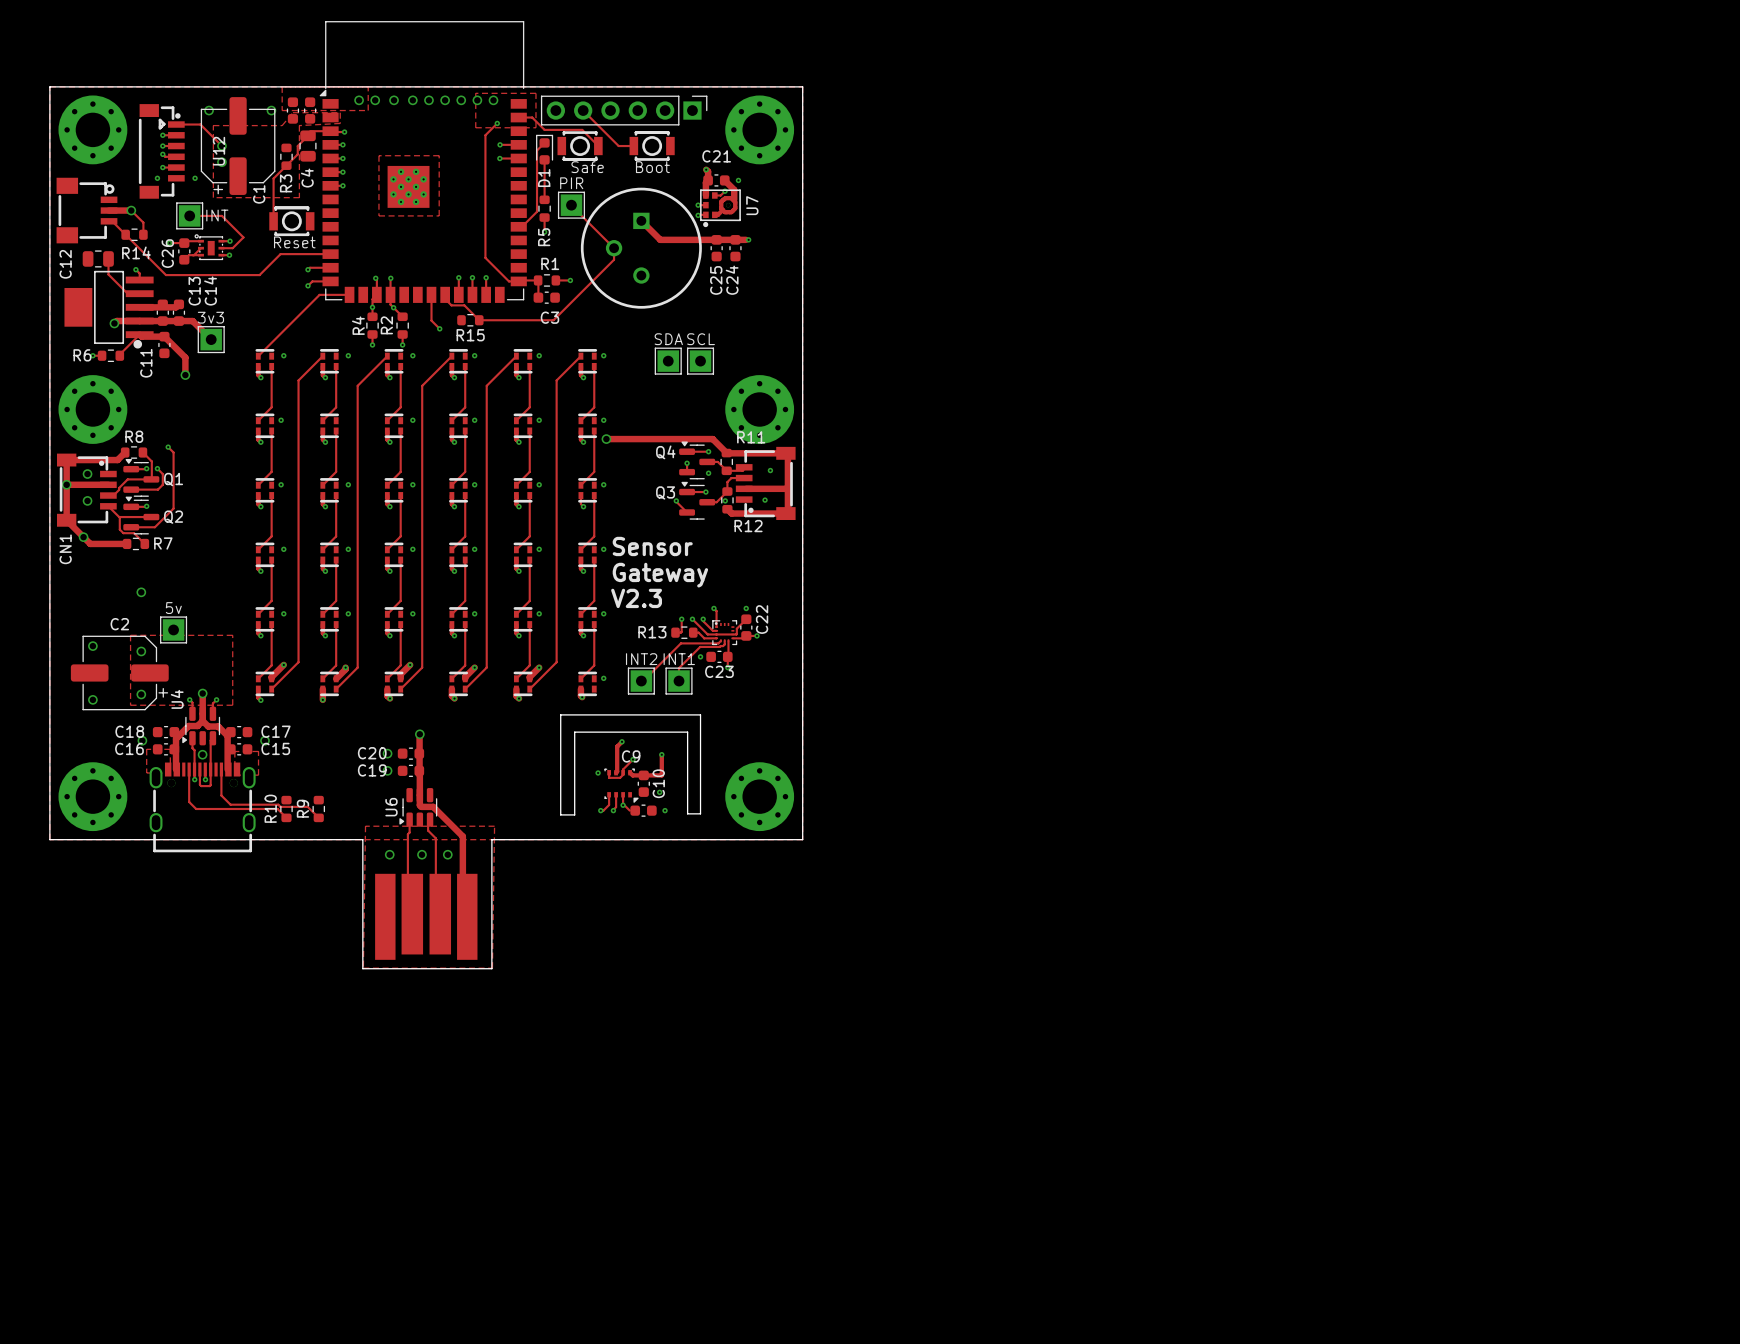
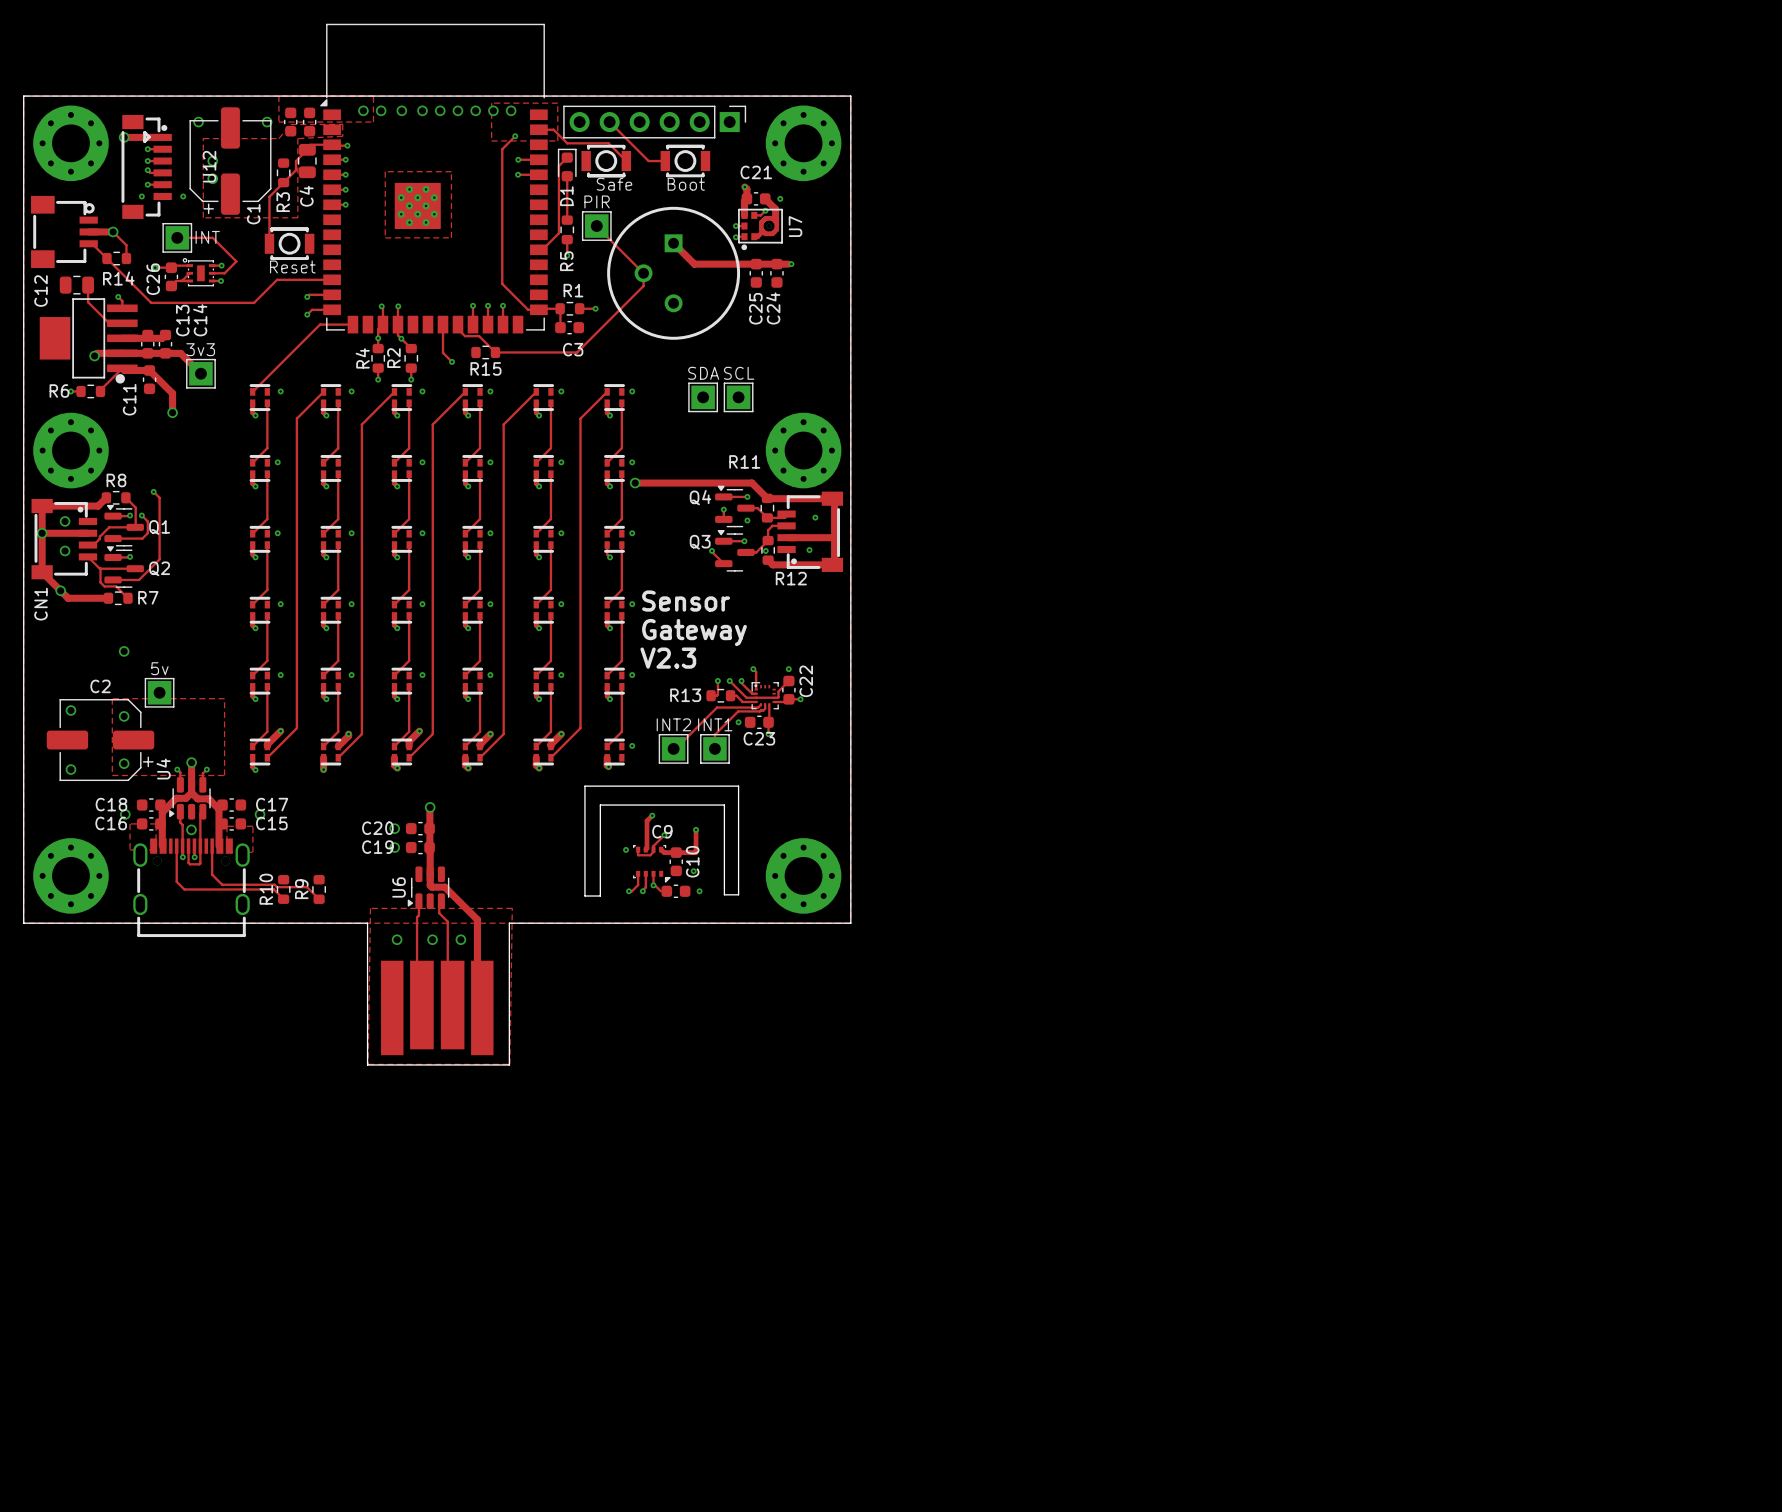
via: none -> (124, 137)
track: (176, 124) (200, 124) (221, 146) -> (162, 137) (124, 137)
R11 name position: R11 (751, 437) -> R11 (744, 461)

